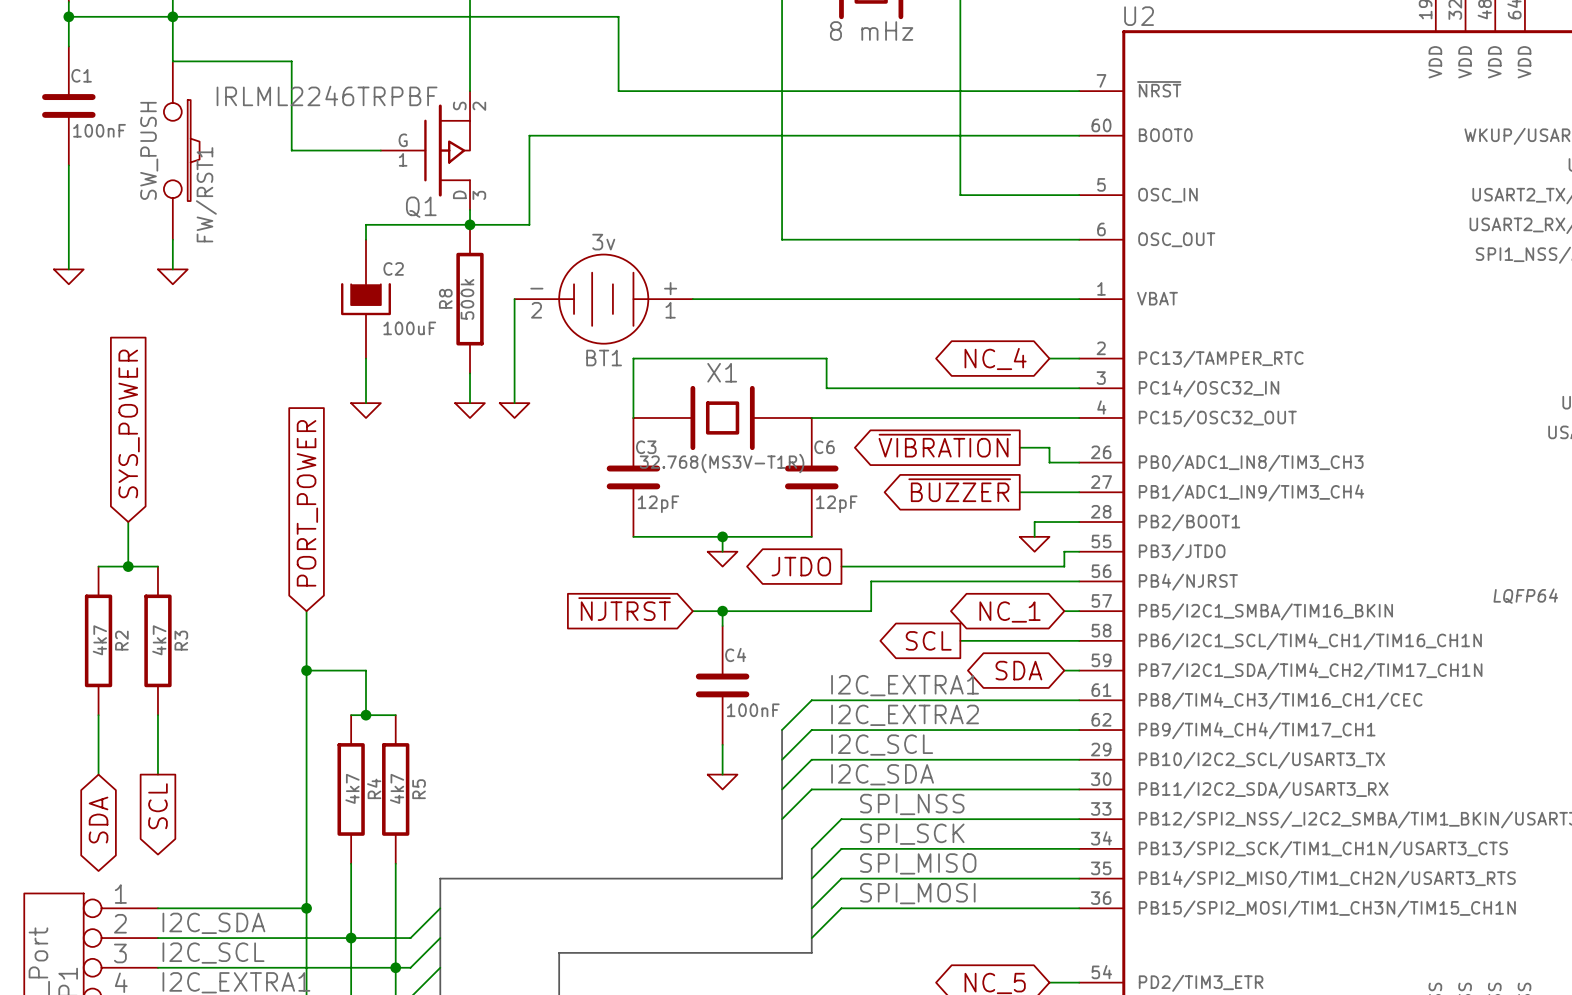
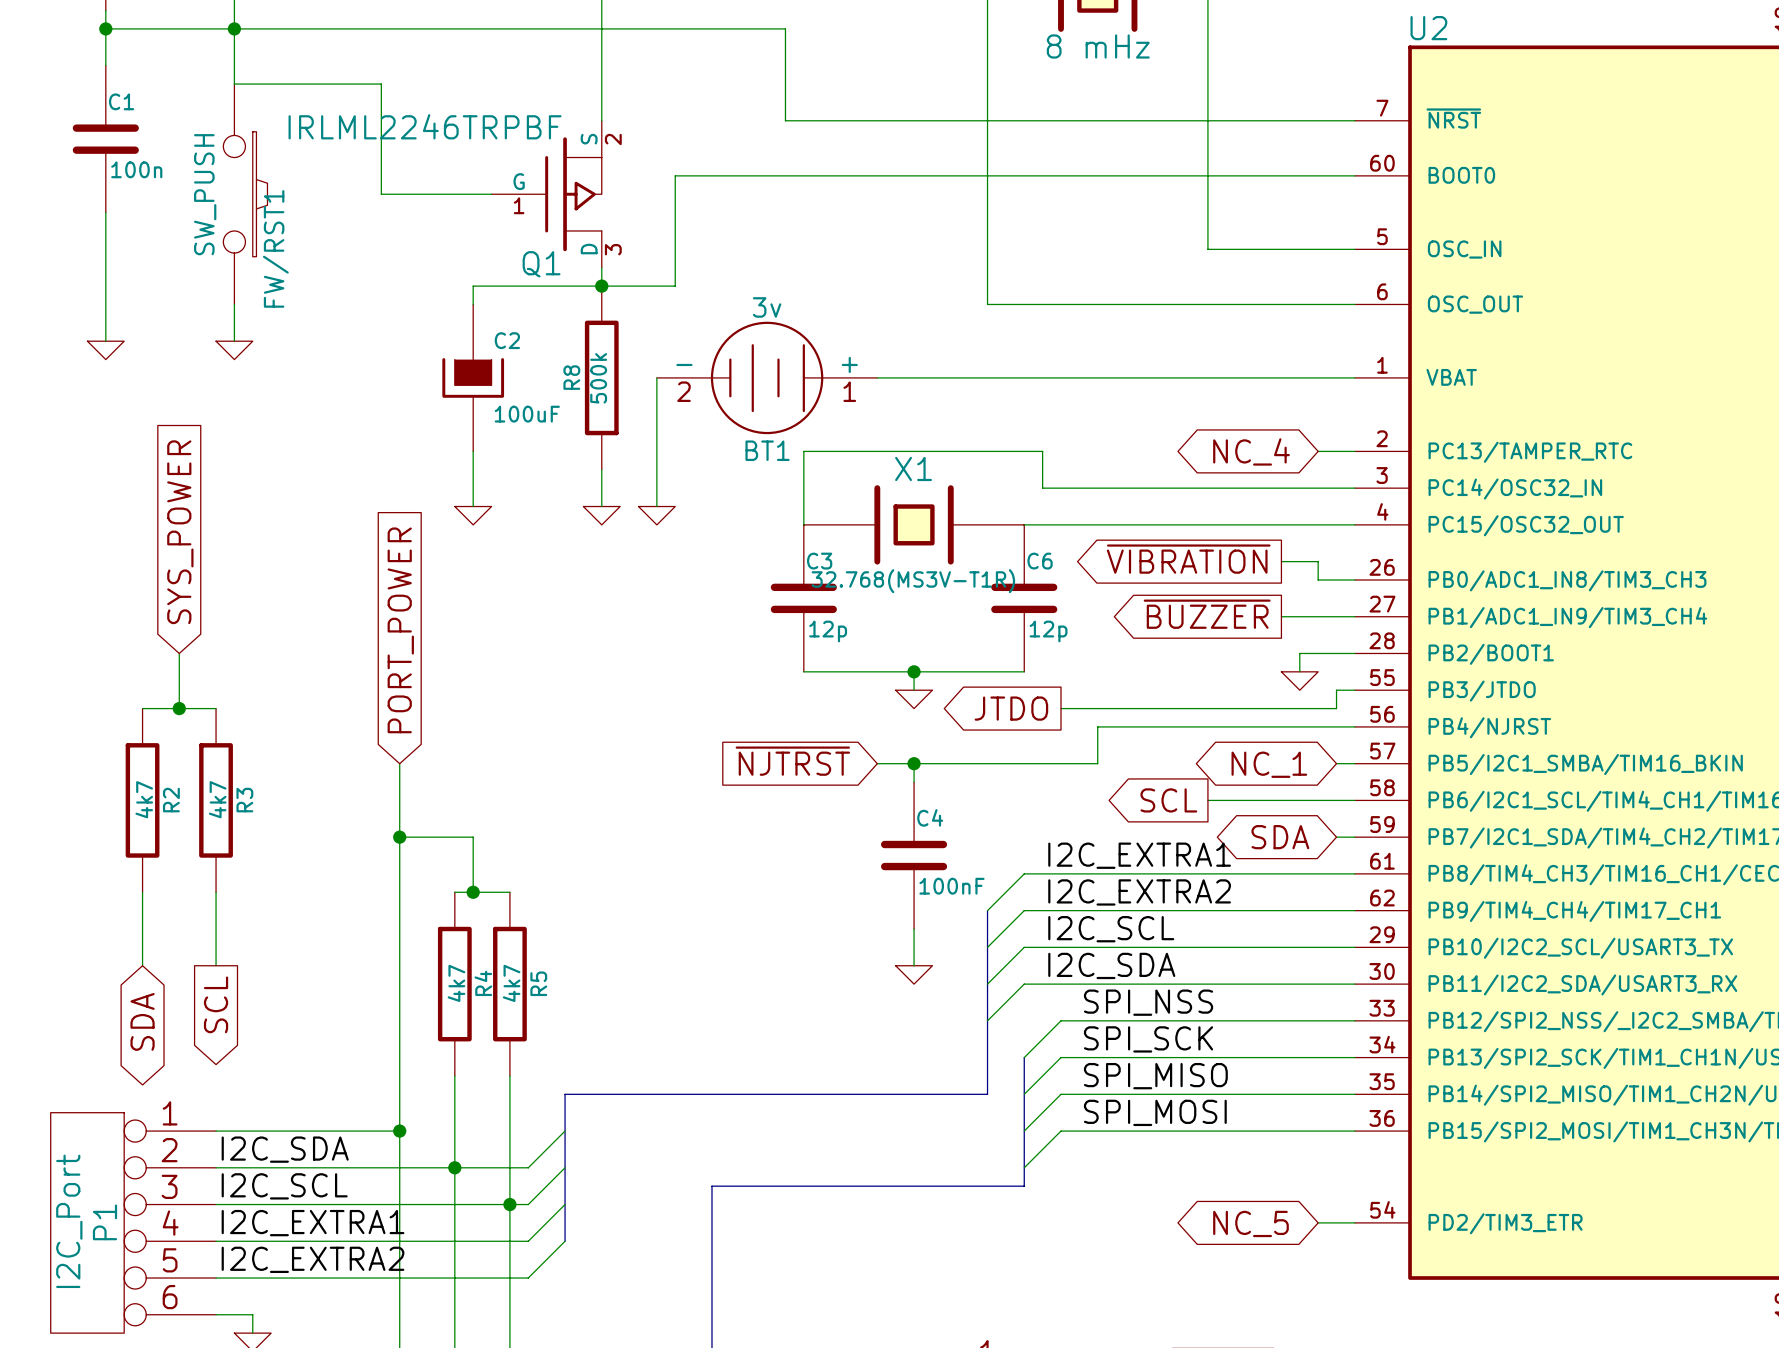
C1 value: 100nF (99, 130) -> 100n (136, 169)
C3 value: 12pF (658, 504) -> 12p (828, 631)
C6 value: 12pF (836, 504) -> 12p (1048, 631)

